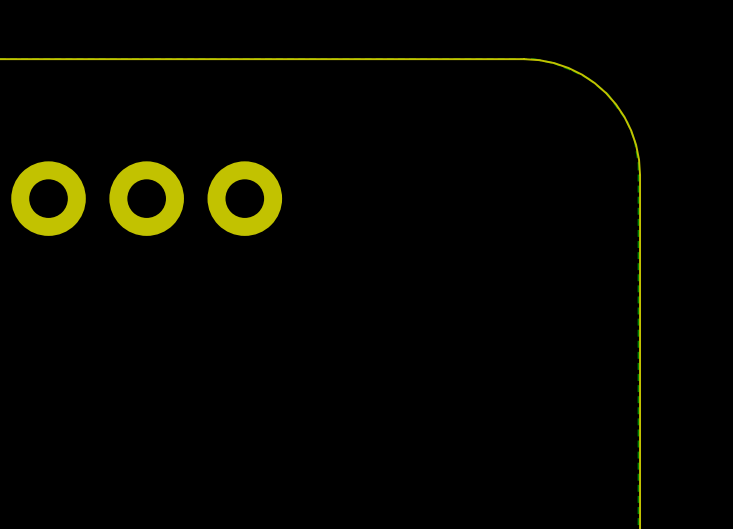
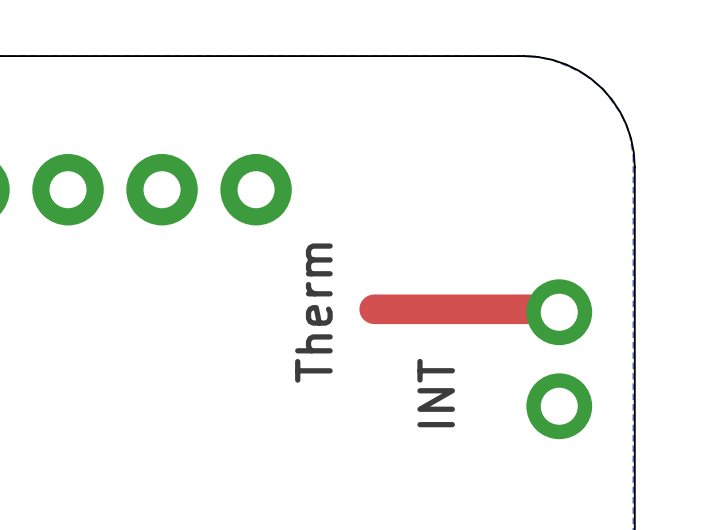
top track: none -> (374, 309) (556, 309) (559, 312)
part: none -> (559, 312)
text: none -> Therm (313, 313)
text: none -> INT (436, 393)
part: none -> (559, 406)

